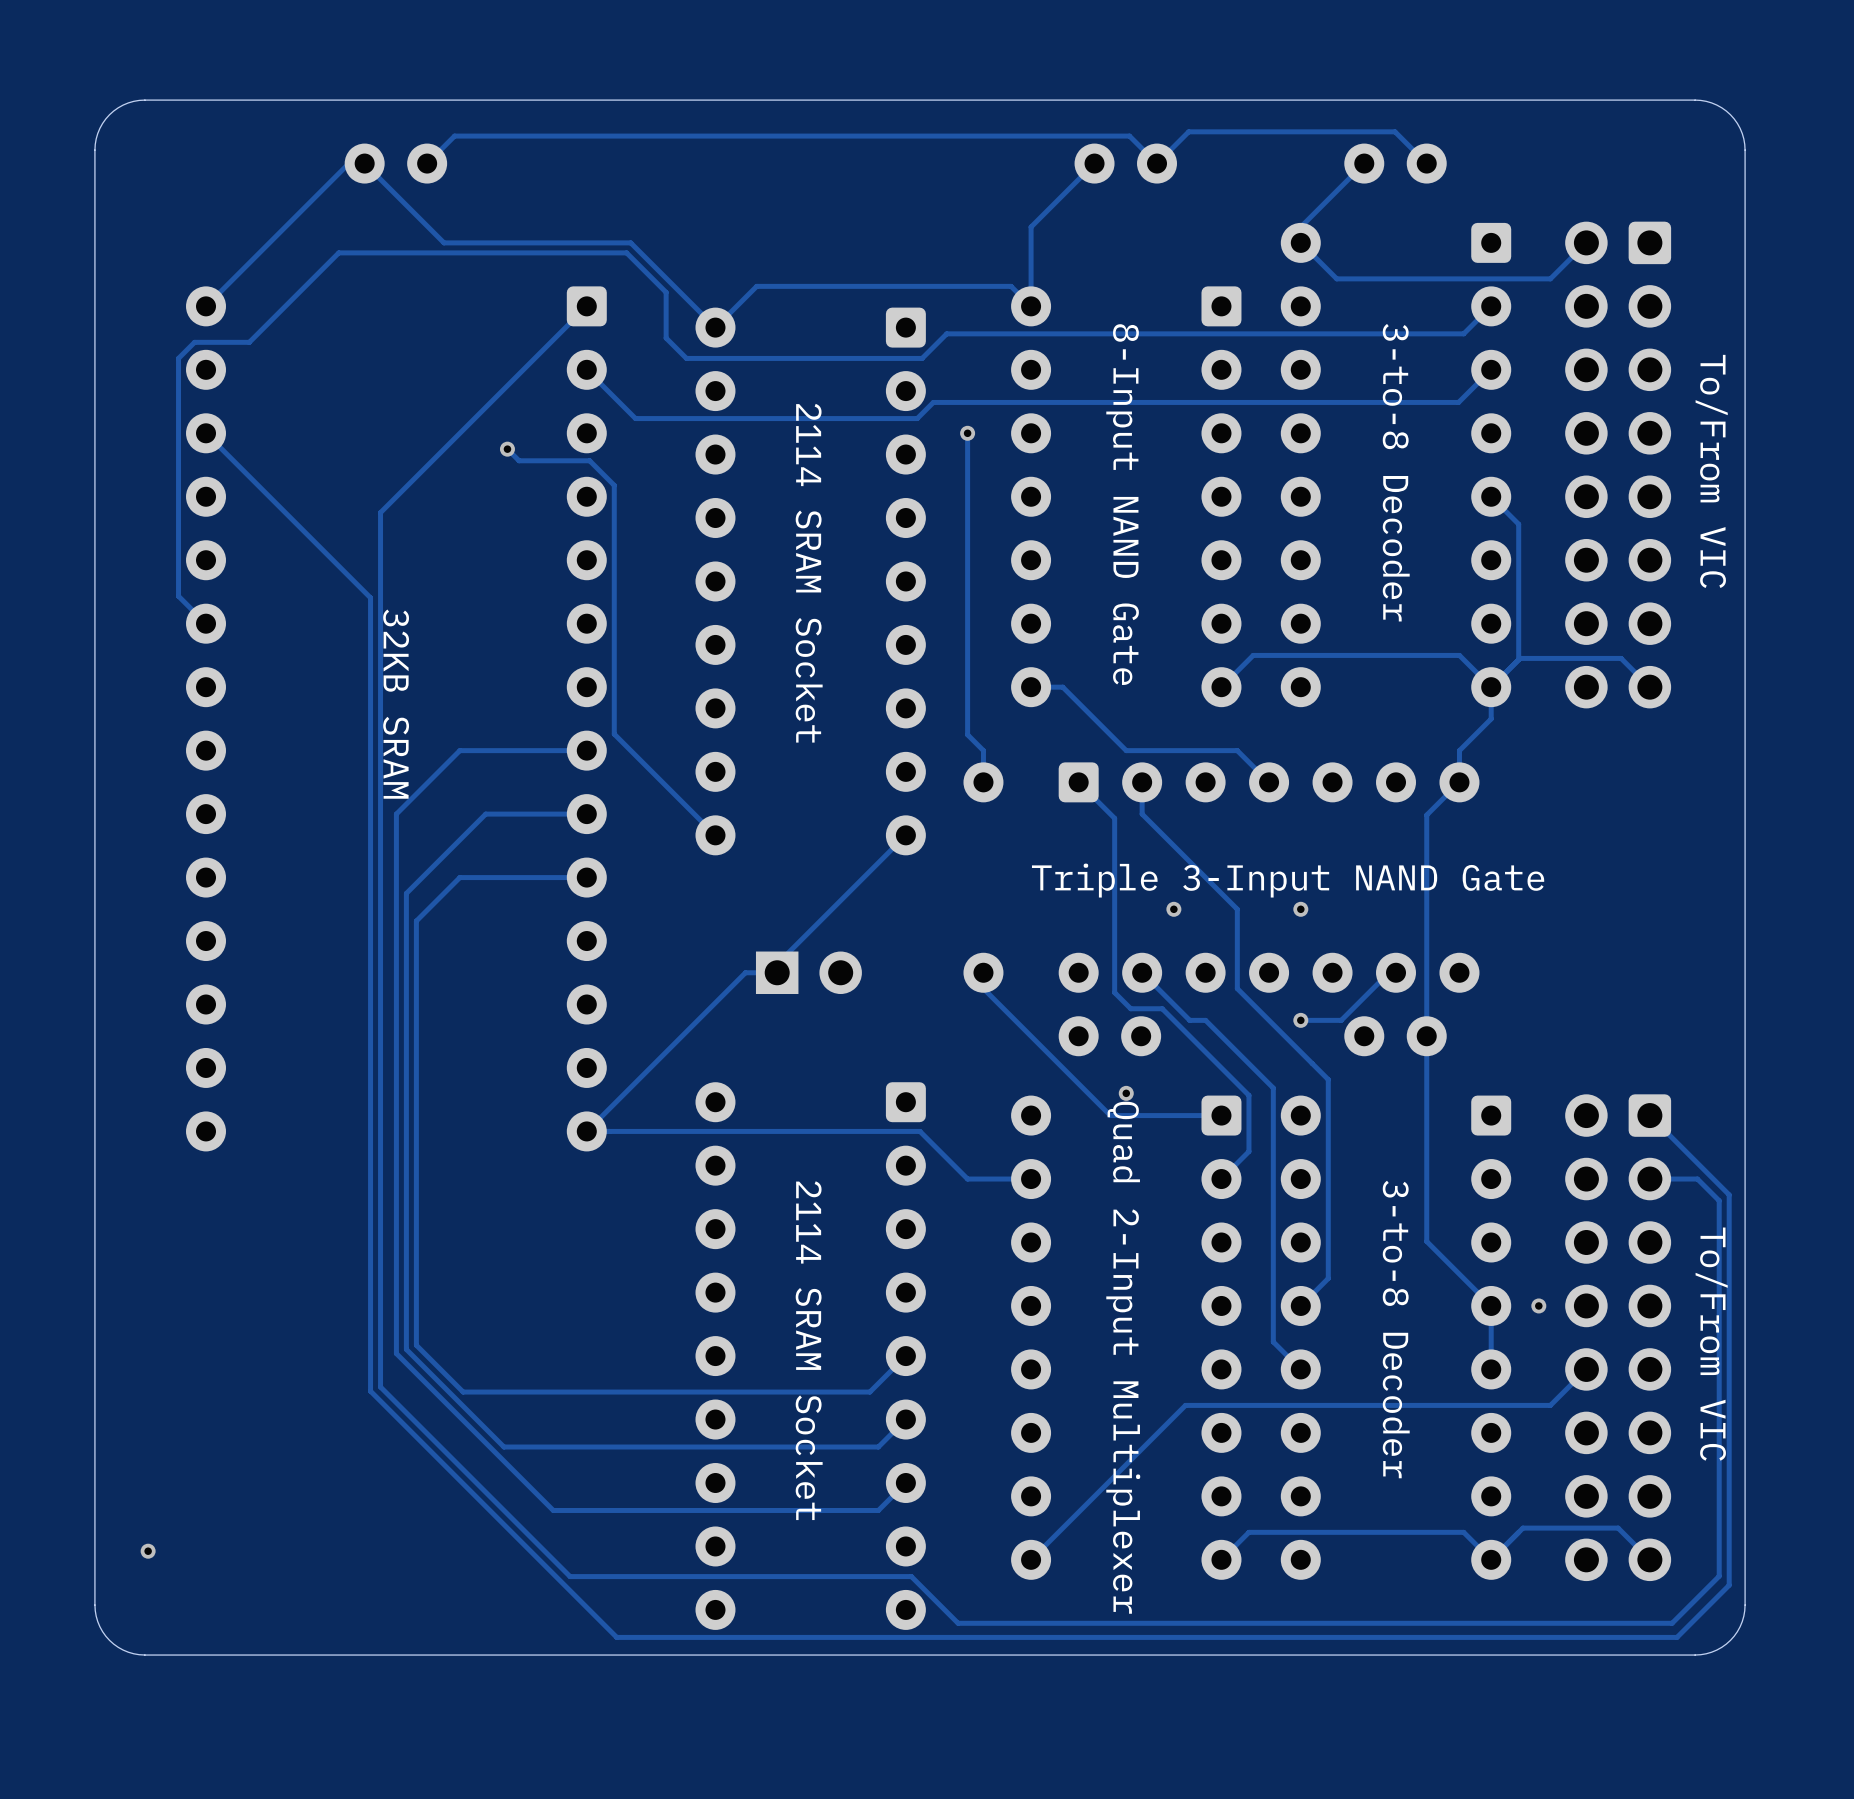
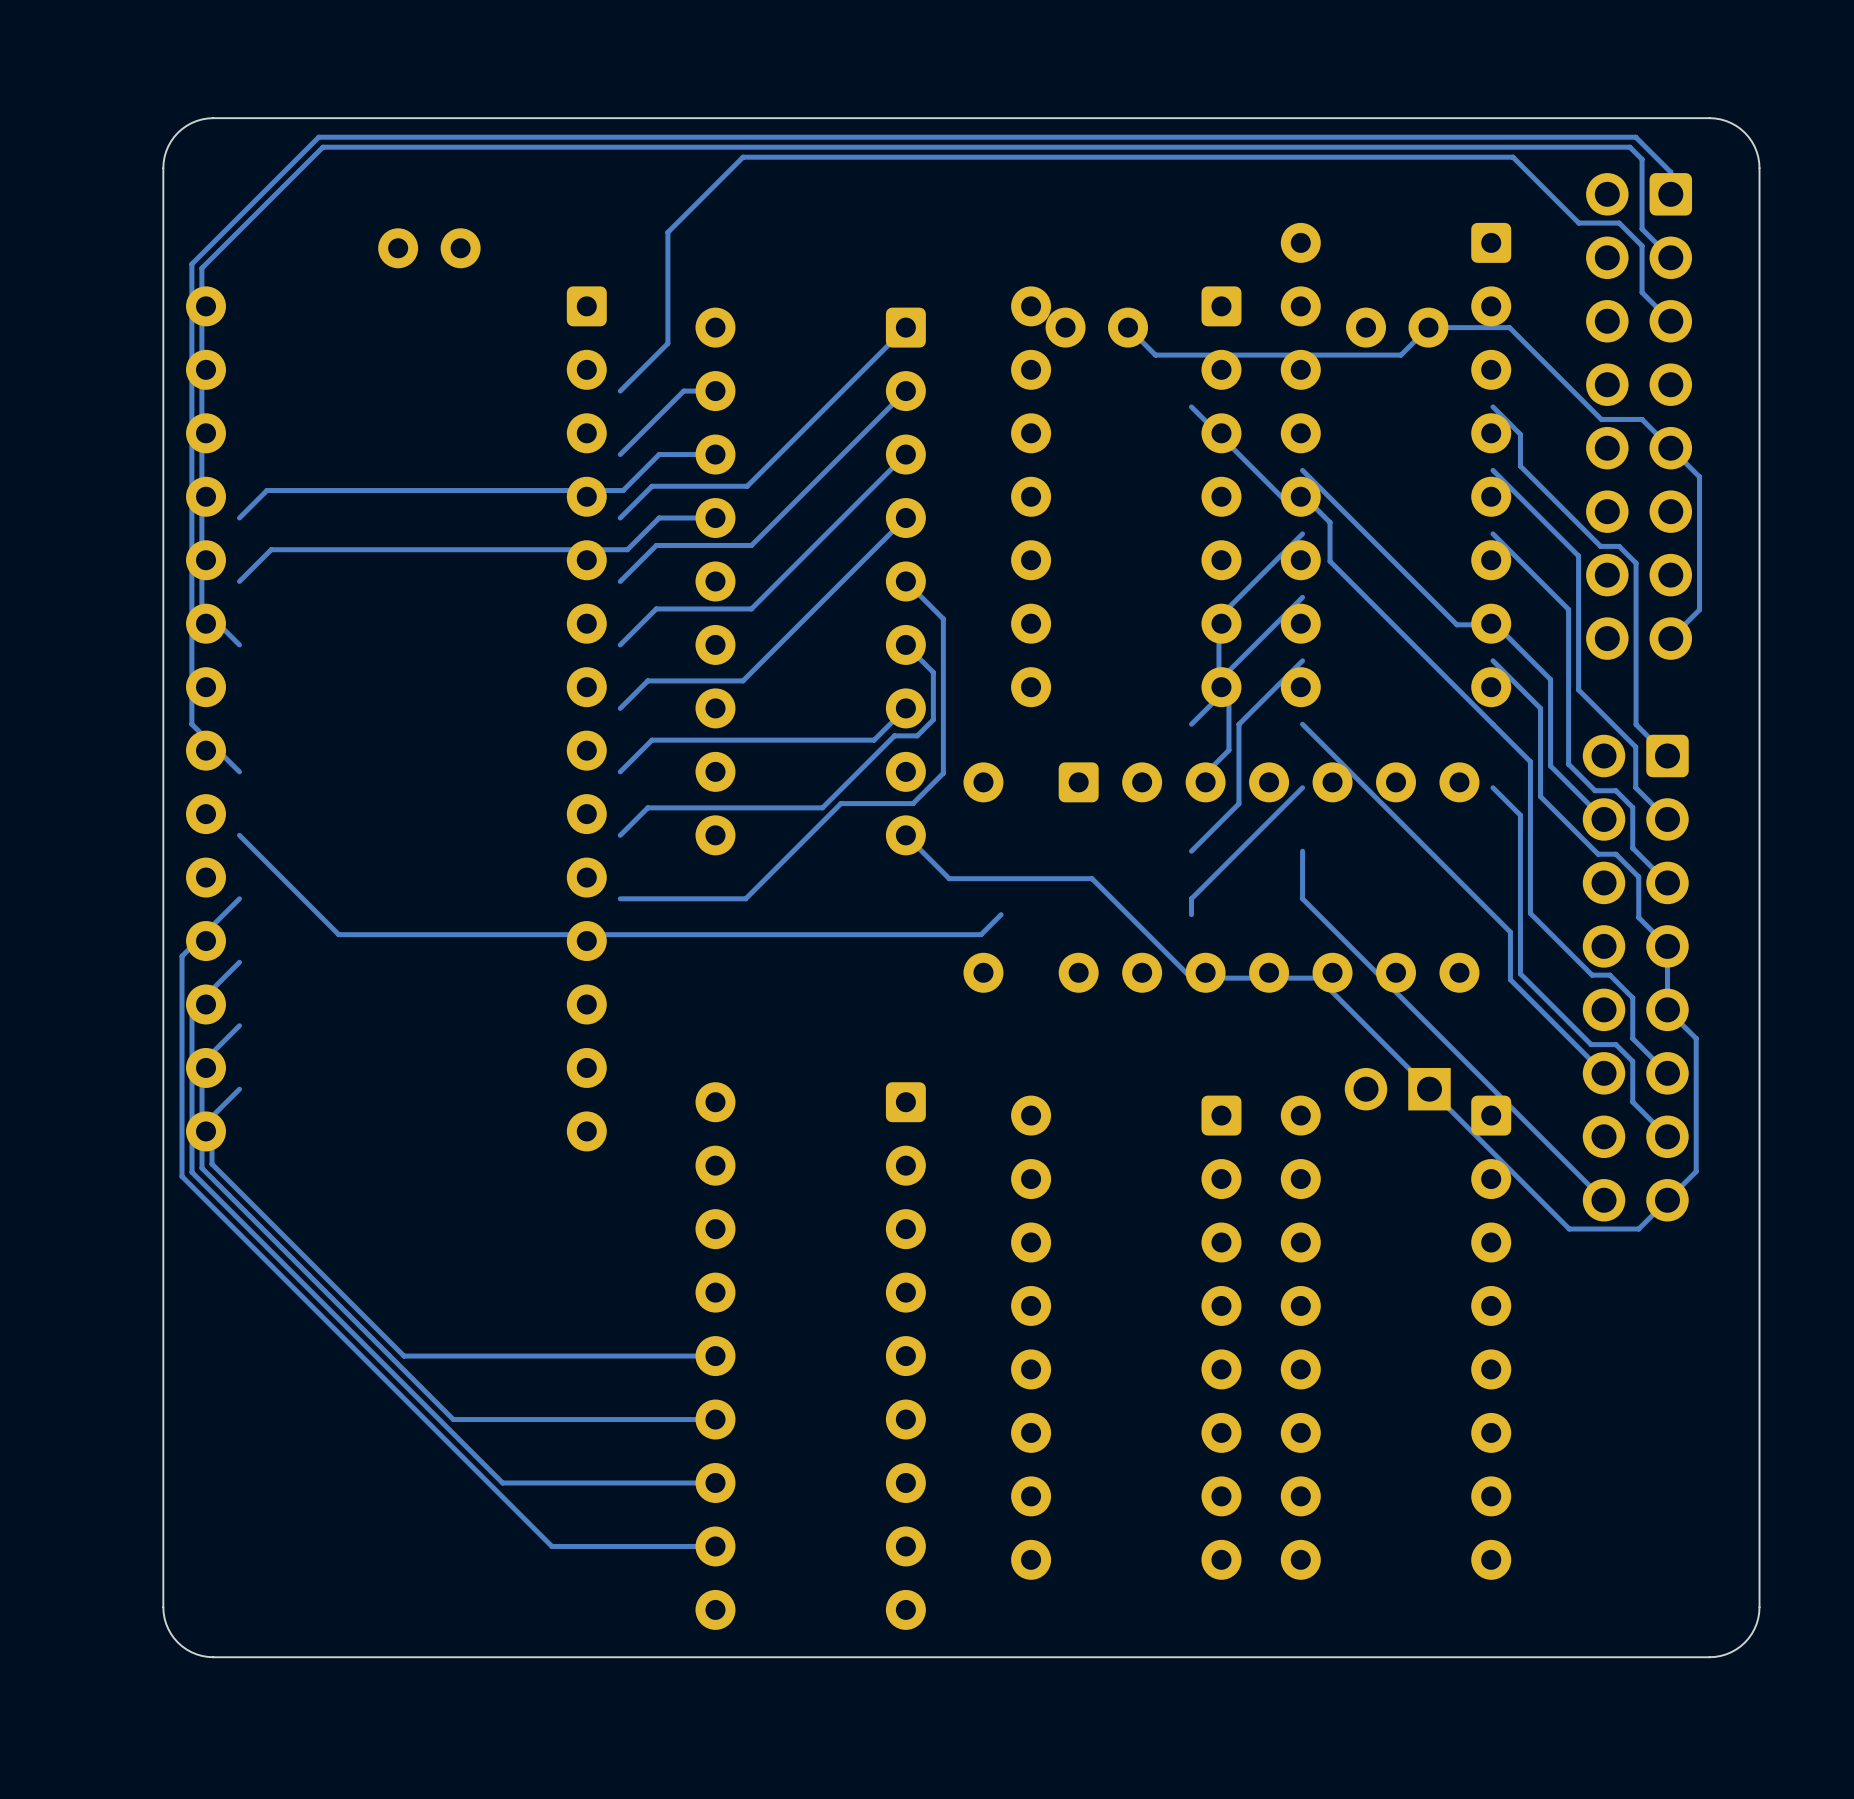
board edge: (1695, 100) (144, 100) (123, 105) (109, 114) (97, 133) (94, 150) (94, 1605) (97, 1621) (109, 1640) (128, 1652) (144, 1655) (1695, 1655) (1716, 1650) (1730, 1640) (1742, 1621) (1745, 1605) (1745, 150) (1742, 133) (1730, 114) (1716, 105) (1695, 100) -> (1709, 118) (1731, 123) (1744, 132) (1756, 151) (1759, 168) (1759, 1607) (1756, 1623) (1744, 1642) (1726, 1654) (1709, 1657) (213, 1657) (191, 1652) (177, 1642) (166, 1623) (163, 1607) (163, 168) (168, 146) (177, 132) (196, 120) (213, 118) (1709, 118)
part position: (395, 163) -> (429, 248)
track: (1094, 163) (1031, 227) (1031, 306) (1011, 286) (756, 286) (715, 327) (630, 242) (444, 242) (364, 163) (348, 163) (206, 306) -> none
part: (1125, 163) -> none
track: (1364, 163) (1300, 227) (1300, 242) (1336, 278) (1550, 278) (1586, 242) -> none
part: (1395, 163) -> none
track: (1426, 163) (1395, 131) (1188, 131) (1157, 163) (1129, 136) (454, 136) (427, 163) -> none
track: none -> (1670, 194) (1670, 172) (1635, 137) (318, 137) (191, 264) (191, 724) (239, 771)
track: none -> (1670, 257) (1642, 229) (1642, 159) (1629, 147) (322, 147) (201, 268) (201, 607) (239, 644)
track: (586, 306) (380, 512) (380, 1387) (570, 1576) (911, 1576) (958, 1623) (1672, 1623) (1719, 1576) (1719, 1200) (1697, 1179) (1649, 1179) -> none
track: (1491, 306) (1463, 333) (946, 333) (922, 358) (686, 358) (666, 338) (666, 292) (626, 252) (338, 252) (249, 342) (194, 342) (178, 358) (178, 596) (206, 623) -> none
track: none -> (1670, 321) (1642, 292) (1642, 245) (1619, 223) (1578, 223) (1512, 157) (743, 157) (667, 232) (667, 343) (620, 391)
track: none -> (905, 327) (747, 486) (652, 486) (620, 518)
part: none -> (1096, 327)
track: none -> (1128, 327) (1155, 355) (1401, 355) (1428, 327) (1509, 327) (1601, 419) (1642, 419) (1699, 476) (1699, 609) (1670, 638)
part: none -> (1397, 327)
track: (1491, 369) (1458, 402) (933, 402) (917, 418) (635, 418) (586, 369) -> none
track: none -> (715, 391) (683, 391) (620, 454)
track: none -> (905, 391) (751, 545) (656, 545) (620, 581)
track: none -> (1191, 406) (1290, 506) (1313, 506) (1330, 522) (1330, 561) (1530, 761) (1530, 913) (1592, 975) (1609, 975) (1632, 997) (1632, 1038) (1667, 1073)
track: none -> (1492, 406) (1520, 434) (1520, 466) (1600, 546) (1619, 546) (1636, 563) (1636, 724) (1667, 756)
track: (206, 433) (370, 597) (370, 1391) (616, 1637) (1677, 1637) (1729, 1585) (1729, 1194) (1649, 1115) -> none
track: (967, 433) (967, 734) (983, 750) (983, 782) -> none
via: (967, 433) -> none
track: (507, 449) (519, 460) (589, 460) (614, 485) (614, 734) (715, 835) -> none
via: (507, 449) -> none
track: none -> (715, 454) (659, 454) (623, 490) (266, 490) (239, 518)
track: none -> (905, 454) (751, 608) (656, 608) (620, 644)
part position: (1618, 465) -> (1639, 416)
track: none -> (1302, 470) (1456, 624) (1495, 624) (1550, 679) (1550, 766) (1604, 819)
track: none -> (1492, 470) (1578, 556) (1578, 689) (1635, 747) (1635, 787) (1667, 819)
text: To/From VIC (1711, 471) -> none
text: 3-to-8 Decoder (1396, 472) -> none
track: (1491, 496) (1518, 524) (1518, 659) -> none
text: 8-Input NAND Gate (1122, 504) -> none
track: none -> (715, 518) (659, 518) (627, 549) (271, 549) (239, 581)
track: none -> (905, 518) (742, 680) (647, 680) (620, 708)
track: none -> (1302, 533) (1218, 617) (1218, 696) (1191, 724)
track: none -> (1492, 533) (1568, 609) (1568, 764) (1595, 790) (1615, 790) (1632, 807) (1632, 848) (1667, 882)
text: 2114 SRAM Socket (809, 573) -> none
track: none -> (905, 581) (943, 618) (943, 773) (913, 803) (840, 803) (745, 898) (620, 898)
track: none -> (1302, 597) (1228, 670) (1228, 750) (1191, 787)
track: none -> (905, 644) (933, 672) (933, 719) (917, 735) (894, 735) (822, 807) (647, 807) (620, 835)
track: none -> (1302, 660) (1238, 724) (1238, 803) (1191, 851)
track: (1031, 687) (1062, 687) (1126, 750) (1237, 750) (1269, 782) -> none
track: (1491, 687) (1491, 718) (1459, 750) (1459, 782) (1426, 815) (1426, 1241) (1491, 1305) (1491, 1369) -> none
track: (1491, 687) (1459, 655) (1253, 655) (1221, 687) -> none
track: (1649, 687) (1621, 658) (1519, 658) (1491, 687) -> none
text: 32KB SRAM (396, 704) -> none
track: none -> (905, 708) (874, 740) (652, 740) (620, 771)
track: none -> (1302, 724) (1510, 932) (1510, 979) (1604, 1073)
track: (586, 750) (459, 750) (396, 814) (396, 1353) (553, 1510) (878, 1510) (905, 1483) -> none
track: (1078, 782) (1114, 818) (1114, 992) (1130, 1008) (1162, 1008) (1248, 1095) (1248, 1151) (1221, 1179) -> none
track: (1142, 782) (1142, 814) (1237, 909) (1237, 988) (1328, 1079) (1328, 1278) (1300, 1305) -> none
track: none -> (1302, 787) (1191, 898) (1191, 914)
track: none -> (1492, 787) (1520, 815) (1520, 973) (1591, 1044) (1615, 1044) (1632, 1061) (1632, 1102) (1667, 1136)
track: (586, 814) (485, 814) (406, 893) (406, 1349) (503, 1447) (878, 1447) (905, 1419) -> none
track: none -> (239, 835) (338, 934) (981, 934) (1001, 914)
track: (905, 835) (777, 964) (777, 972) (745, 972) (586, 1131) (920, 1131) (967, 1179) (1031, 1179) -> (905, 835) (949, 878) (1092, 878) (1191, 978) (1318, 978) (1569, 1229) (1638, 1229) (1696, 1171) (1696, 1038) (1667, 1009) (1667, 946) (1638, 917) (1638, 877) (1615, 854) (1598, 854) (1540, 796) (1540, 708) (1492, 660)
track: none -> (1302, 851) (1302, 898) (1604, 1200)
track: (586, 877) (459, 877) (416, 921) (416, 1345) (463, 1392) (869, 1392) (905, 1356) -> none
text: Triple 3-Input NAND Gate (1288, 880) -> none
track: none -> (239, 898) (182, 956) (182, 1176) (552, 1546) (715, 1546)
via: (1173, 909) -> none
via: (1300, 909) -> none
track: none -> (239, 962) (192, 1009) (192, 1172) (502, 1483) (715, 1483)
part rotation: 0° (808, 972) -> 180° (1397, 1089)
part position: (808, 972) -> (1397, 1089)
track: (983, 972) (983, 988) (1110, 1115) (1221, 1115) -> none
track: (1142, 972) (1189, 1020) (1205, 1020) (1273, 1088) (1273, 1341) (1300, 1369) -> none
track: (1396, 972) (1388, 972) (1341, 1020) (1300, 1020) -> none
part: none -> (1635, 978)
via: (1300, 1020) -> none
track: none -> (239, 1025) (202, 1063) (202, 1168) (453, 1419) (715, 1419)
part: (1109, 1036) -> none
part: (1395, 1036) -> none
track: none -> (239, 1089) (212, 1116) (212, 1164) (404, 1356) (715, 1356)
via: (1126, 1093) -> none
via: (1538, 1305) -> none
text: 3-to-8 Decoder (1396, 1329) -> none
part: (1618, 1337) -> none
text: To/From VIC (1711, 1344) -> none
text: 2114 SRAM Socket (809, 1350) -> none
text: Quad 2-Input Multiplexer (1123, 1357) -> none
track: (1586, 1369) (1550, 1405) (1185, 1405) (1031, 1559) -> none
via: (148, 1551) -> none
track: (1649, 1559) (1618, 1528) (1522, 1528) (1491, 1559) (1463, 1532) (1248, 1532) (1221, 1559) -> none

